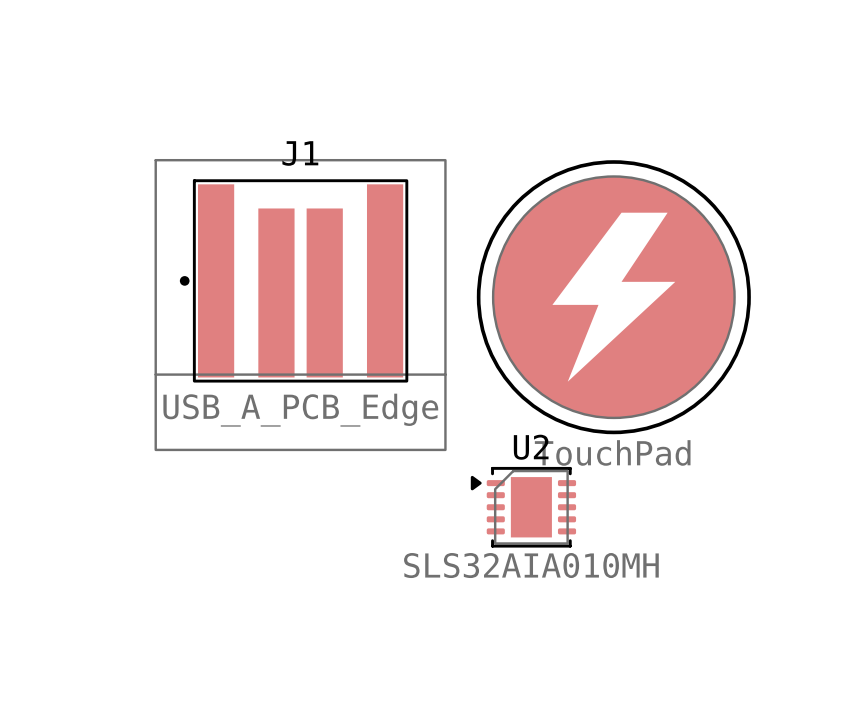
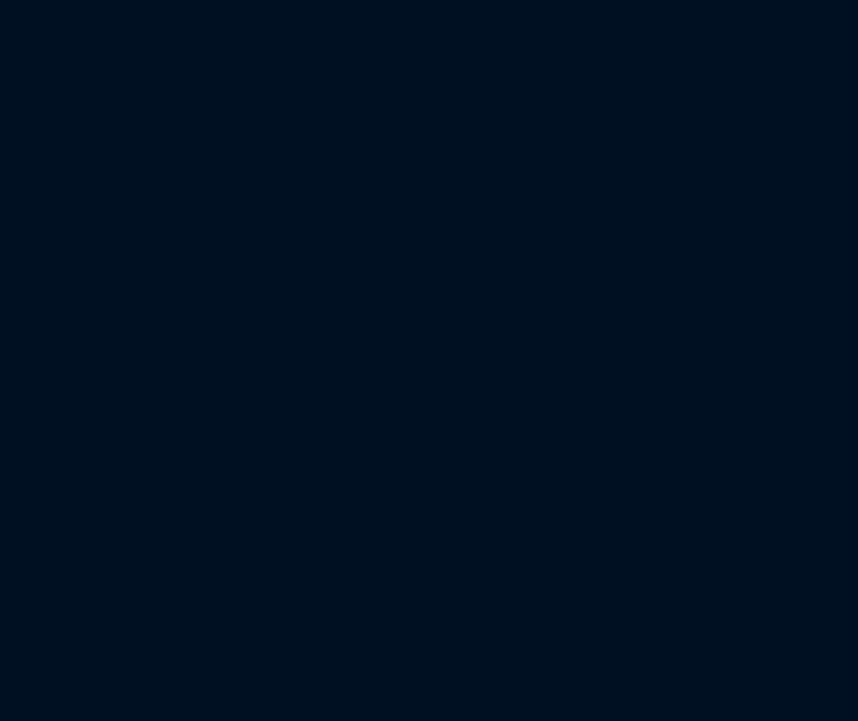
part: TouchPad (613, 297) -> none
J1: USB_A_PCB_Edge (300, 305) -> none
U2: SLS32AIA010MH (523, 507) -> none

